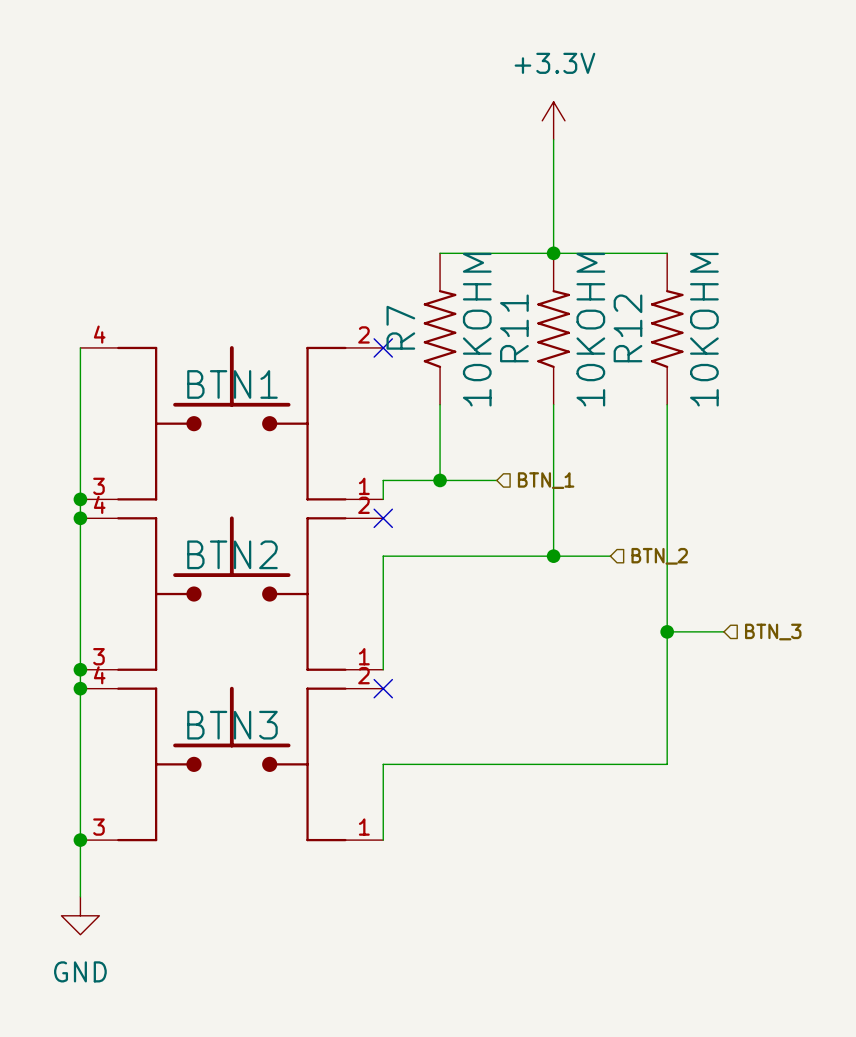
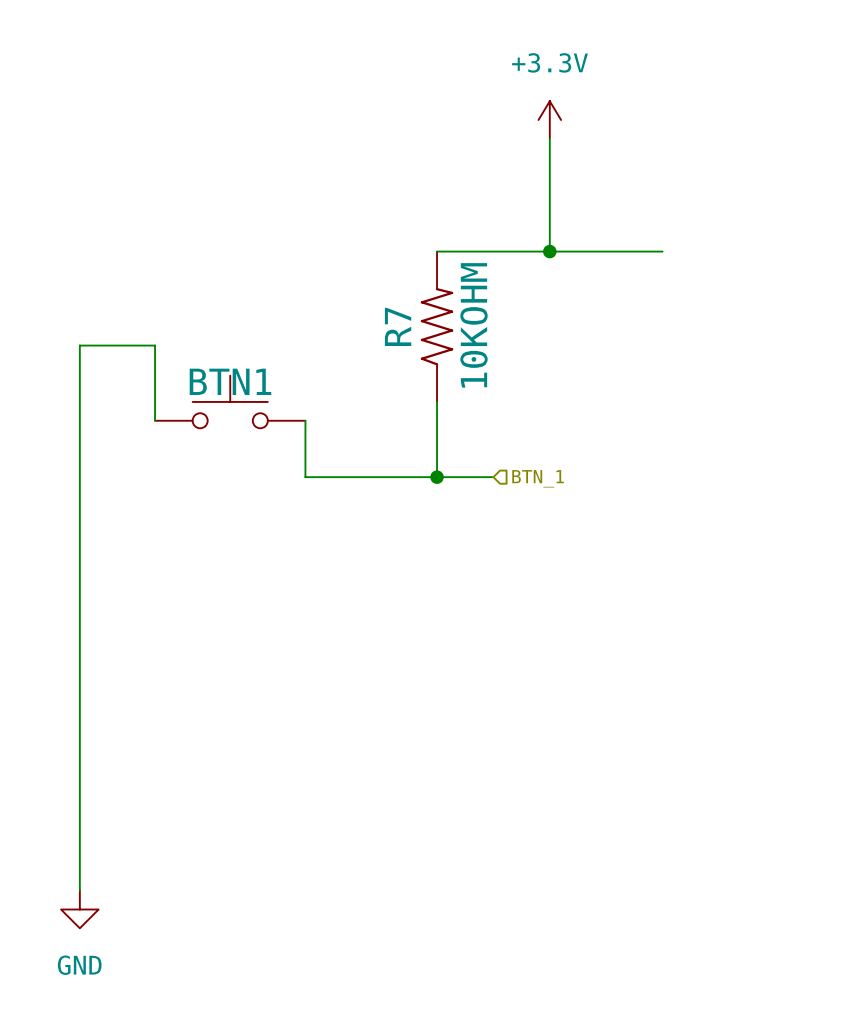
R11: 10KOHM (553, 329) -> none
R12: 10KOHM (667, 329) -> none
BTN1 symbol: [80, 346, 384, 501] -> [155, 375, 306, 429]
no-connect mark: (383, 347) -> none
wire: (553, 404) (553, 556) -> none
wire: (667, 404) (667, 764) (383, 764) (383, 840) -> none
wire: (383, 480) (383, 499) -> (380, 477) (305, 477) (305, 420)
junction: (80, 499) -> none
junction: (80, 518) -> none
no-connect mark: (383, 518) -> none
junction: (553, 556) -> none
wire: (610, 556) (383, 556) (383, 669) -> none
hierarchical label: BTN_2 (659, 556) -> none
BTN2: (231, 593) -> none
wire: (667, 631) (723, 631) -> none
junction: (667, 631) -> none
hierarchical label: BTN_3 (773, 632) -> none
junction: (80, 669) -> none
junction: (80, 688) -> none
no-connect mark: (383, 688) -> none
BTN3: (231, 764) -> none
junction: (80, 840) -> none

